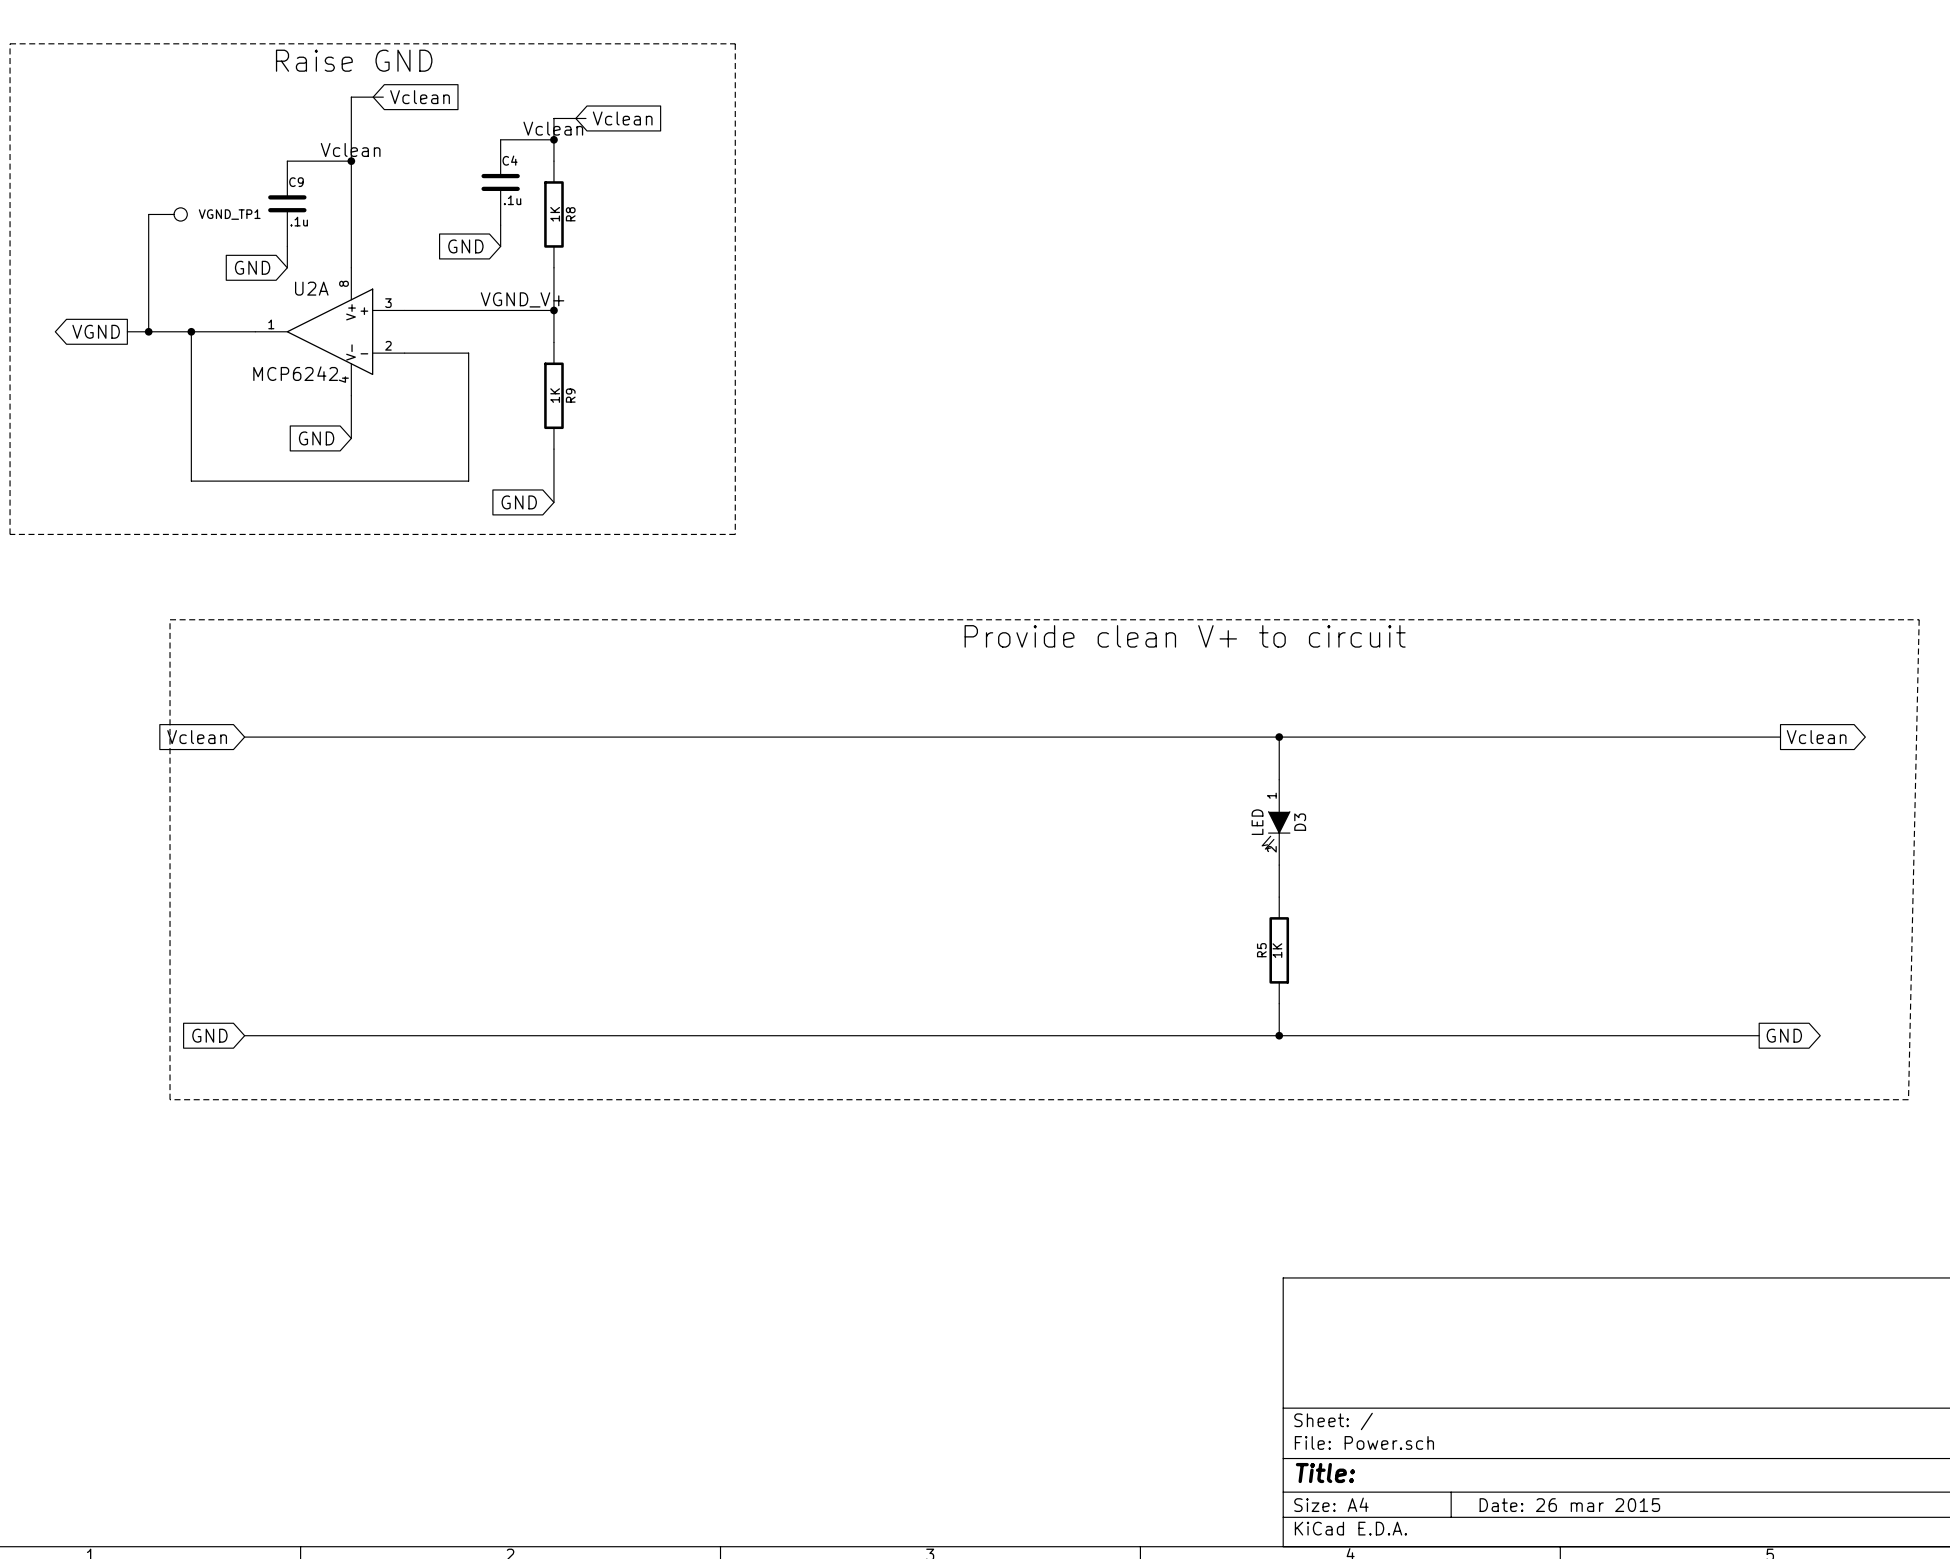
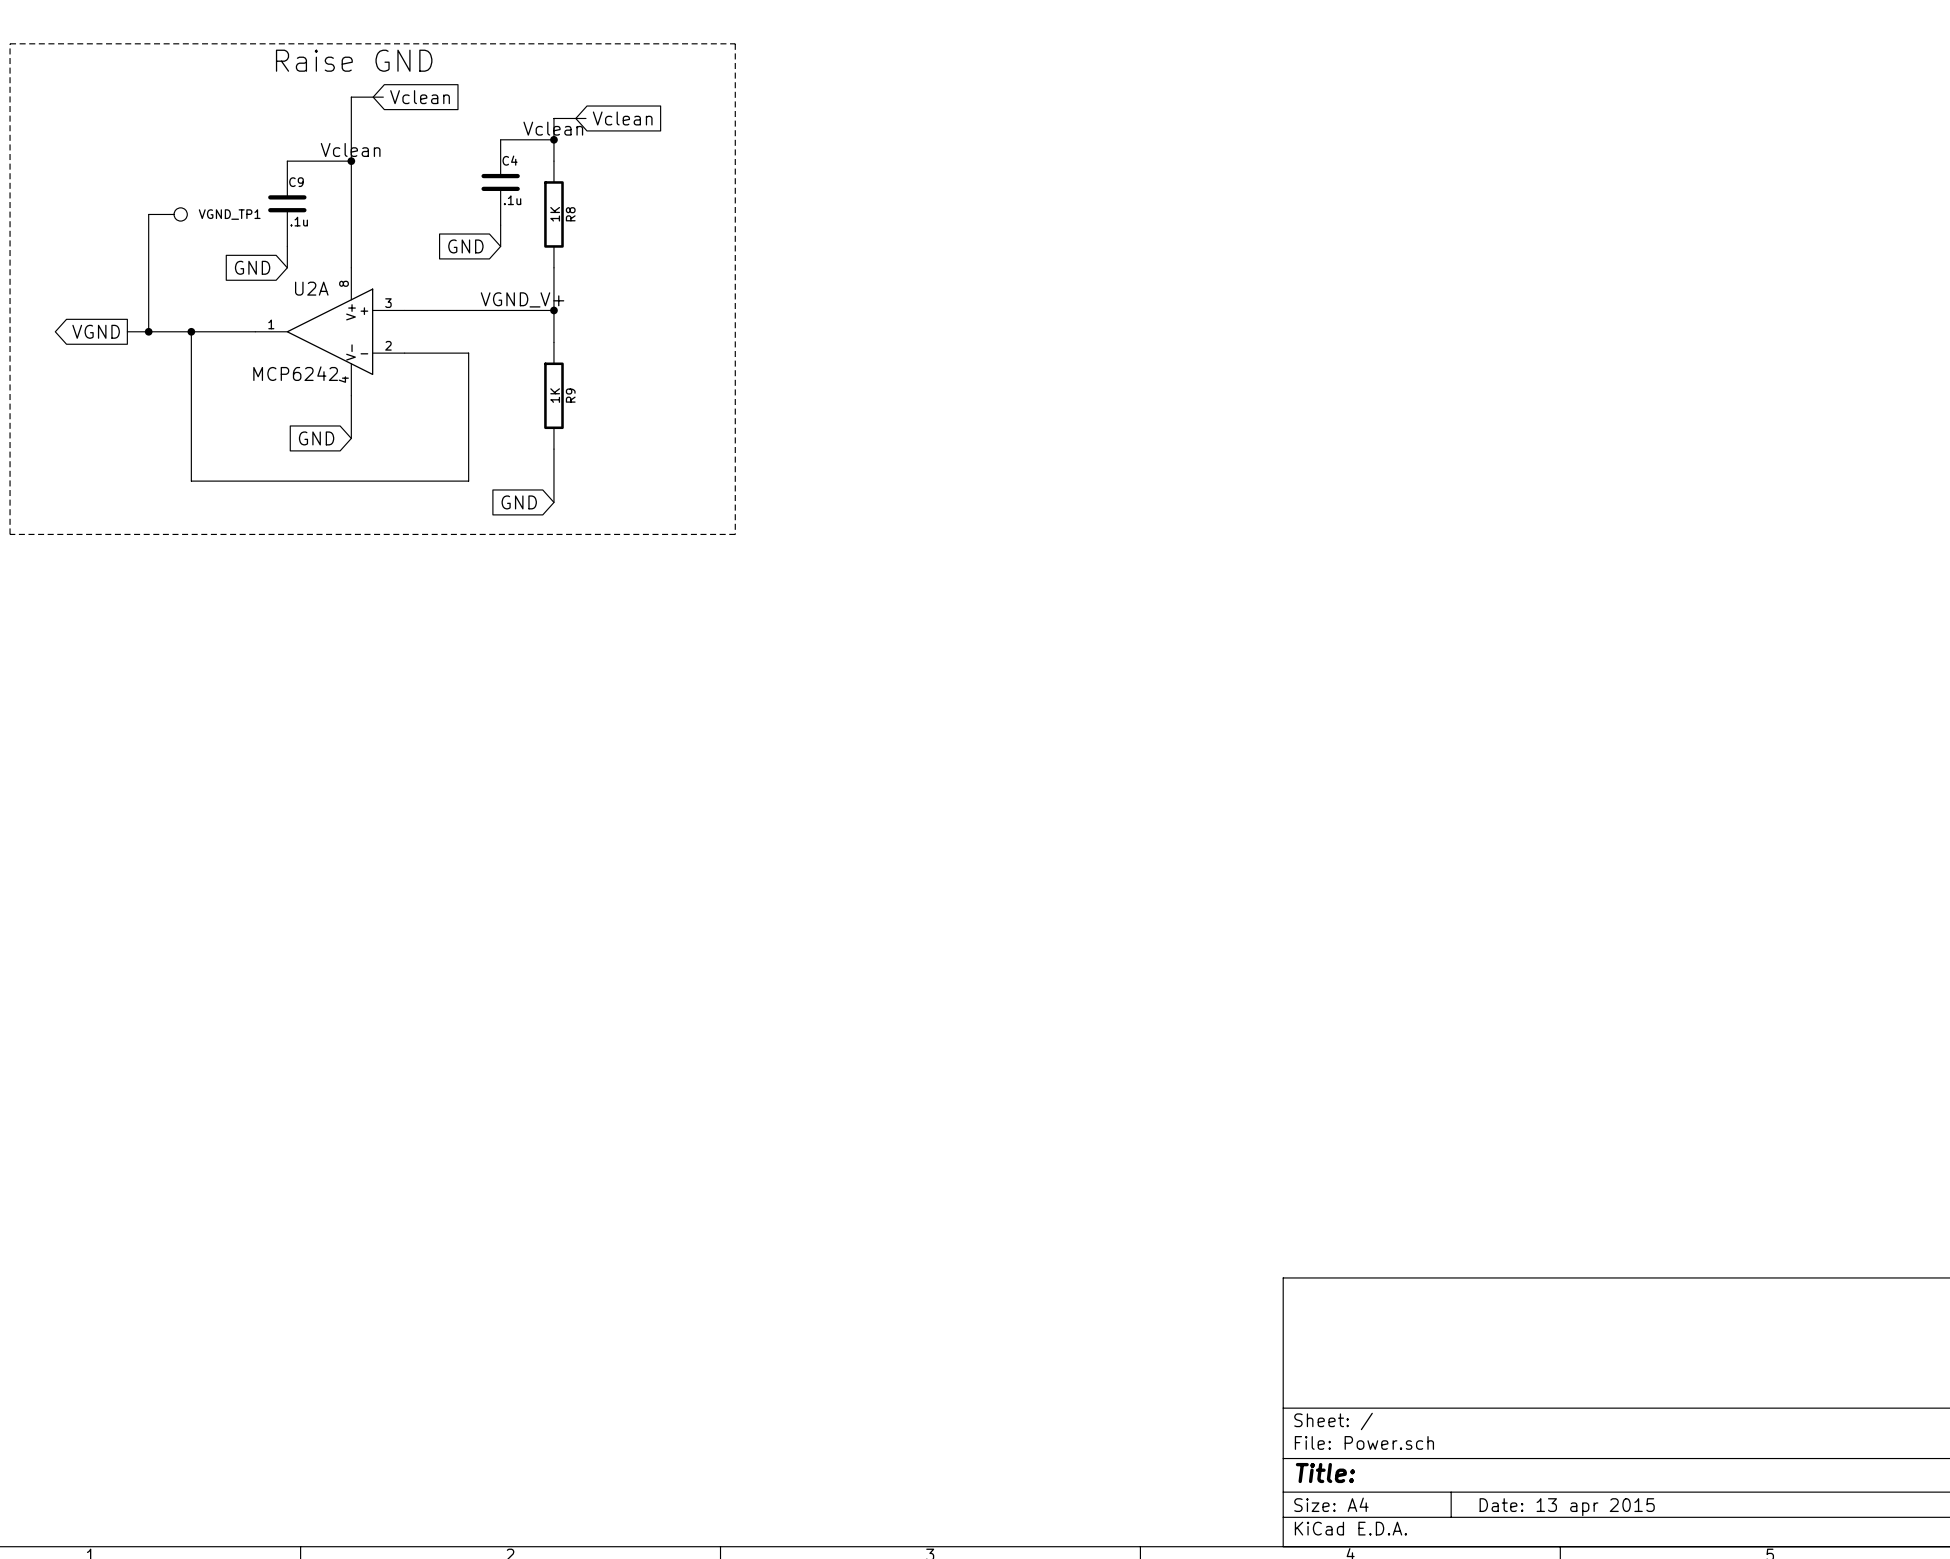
line: (170, 619) (1919, 619) (1908, 1099) (170, 1099) (170, 619) -> none
text: Provide clean V+ to circuit (1185, 636) -> none
global label: Vclean (197, 737) -> none
wire: (244, 737) (1780, 737) -> none
wire: (1279, 737) (1279, 779) -> none
junction: (1279, 737) -> none
global label: Vclean (1816, 737) -> none
D3: LED (1276, 822) -> none
wire: (1279, 865) (1279, 897) -> none
R5: 1K (1279, 950) -> none
wire: (1279, 1003) (1279, 1035) -> none
global label: GND (209, 1035) -> none
wire: (244, 1035) (1759, 1035) -> none
junction: (1279, 1035) -> none
global label: GND (1784, 1035) -> none
title block: Date: 26 mar 2015 (1569, 1505) -> Date: 13 apr 2015 (1567, 1507)

